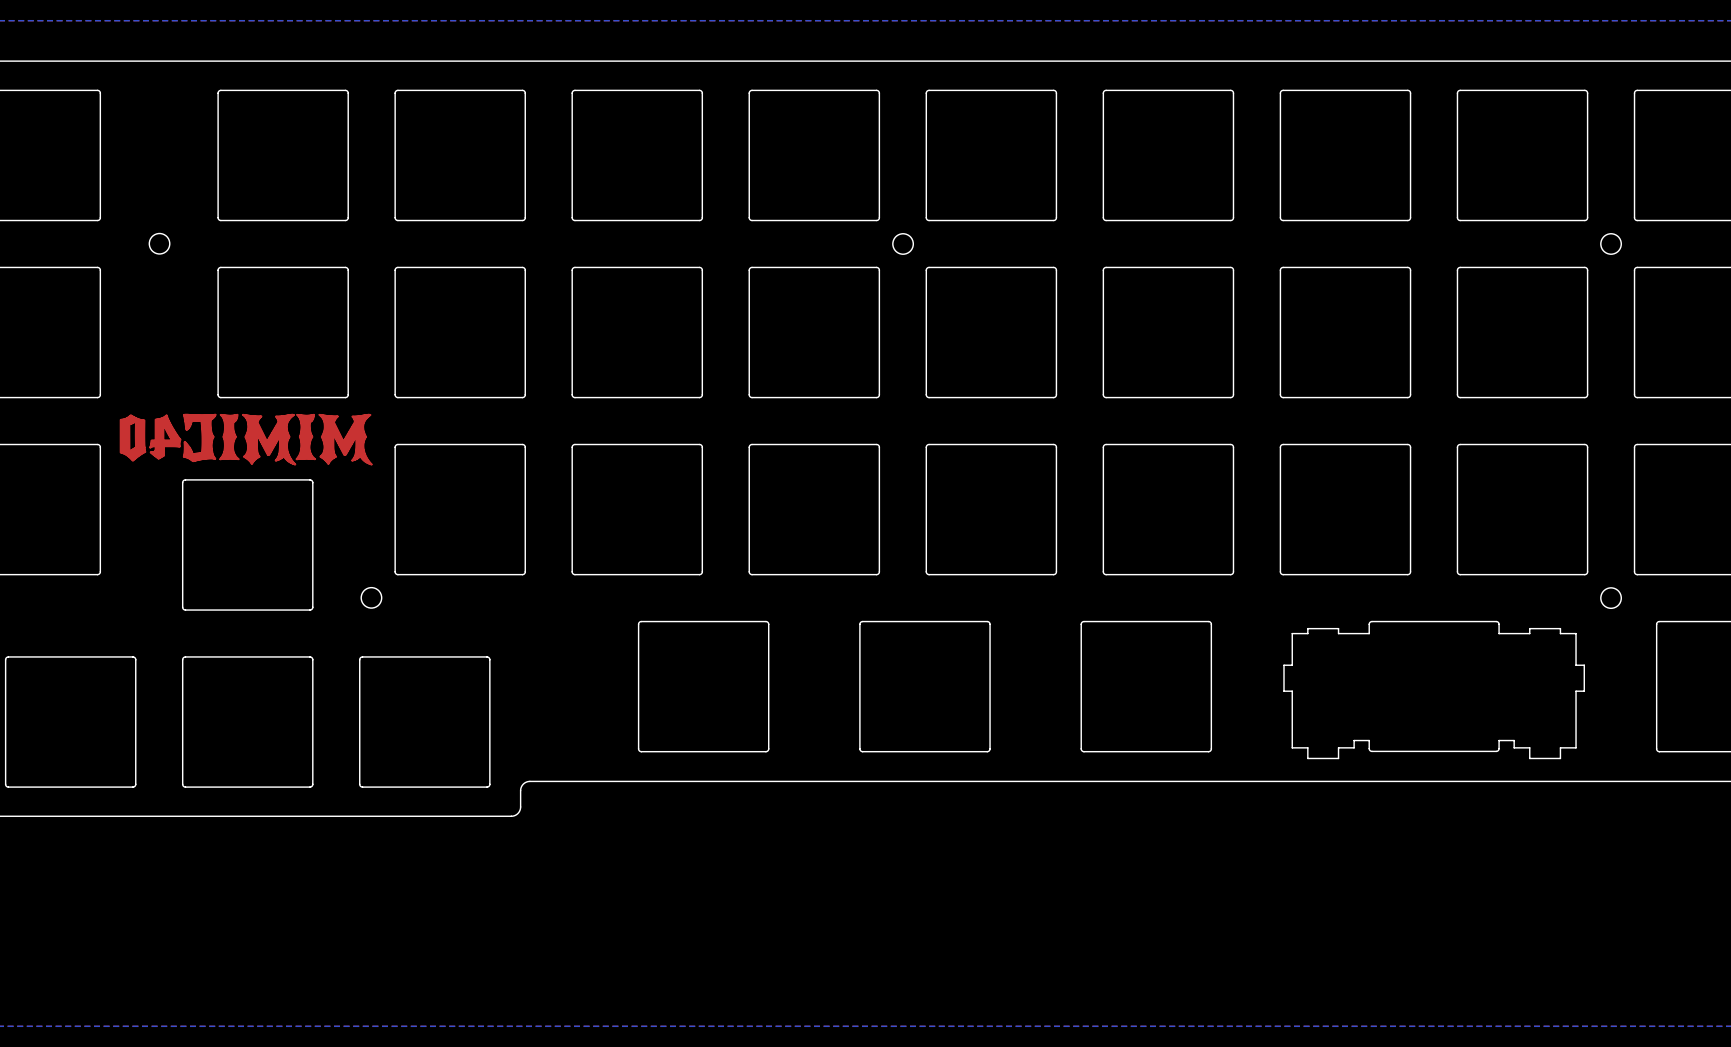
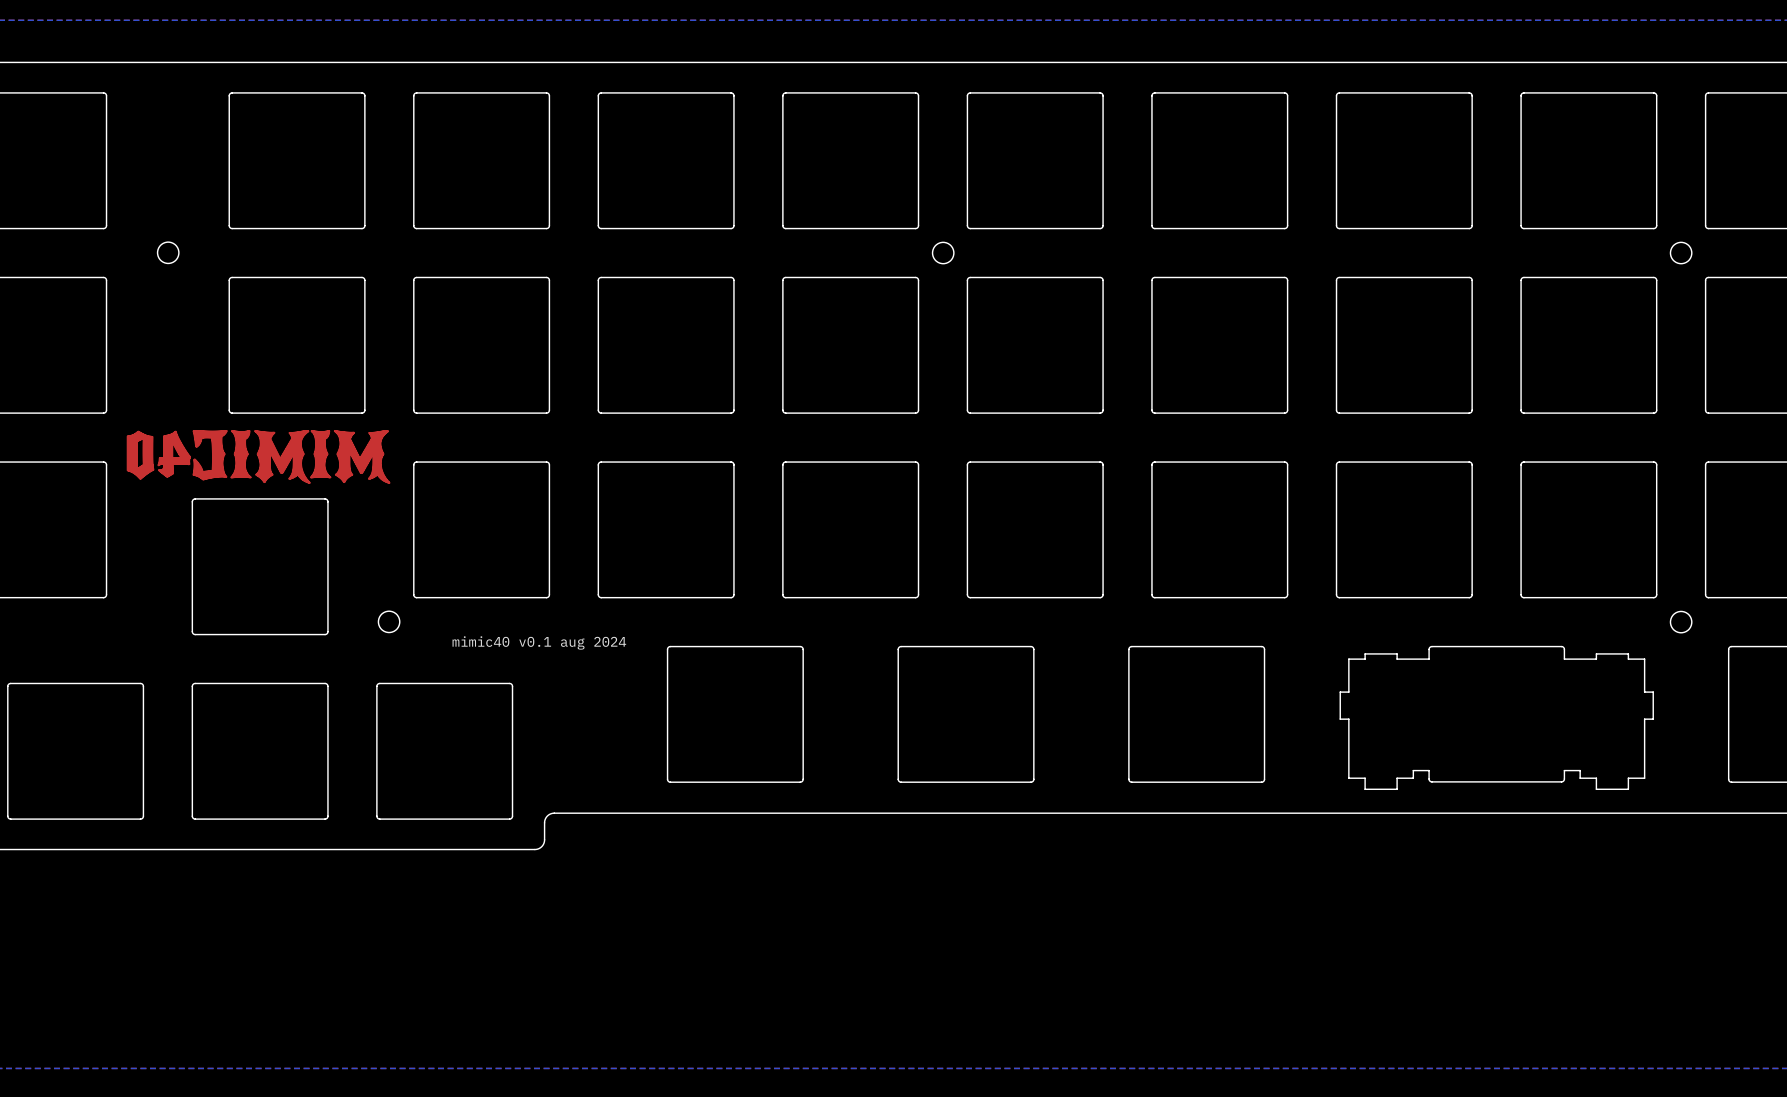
text: none -> mimic40 v0.1 aug 2024 (539, 642)

